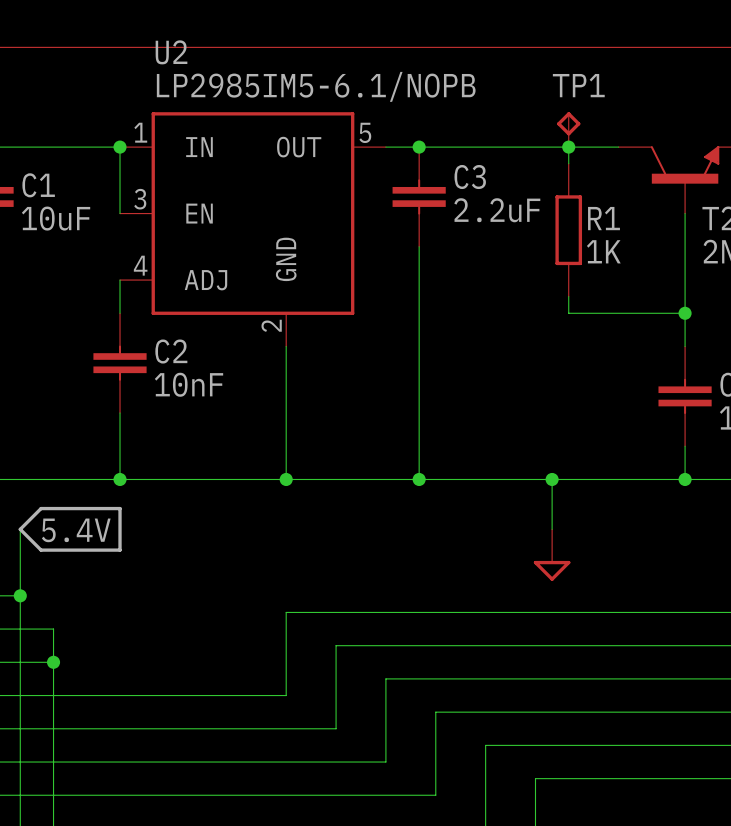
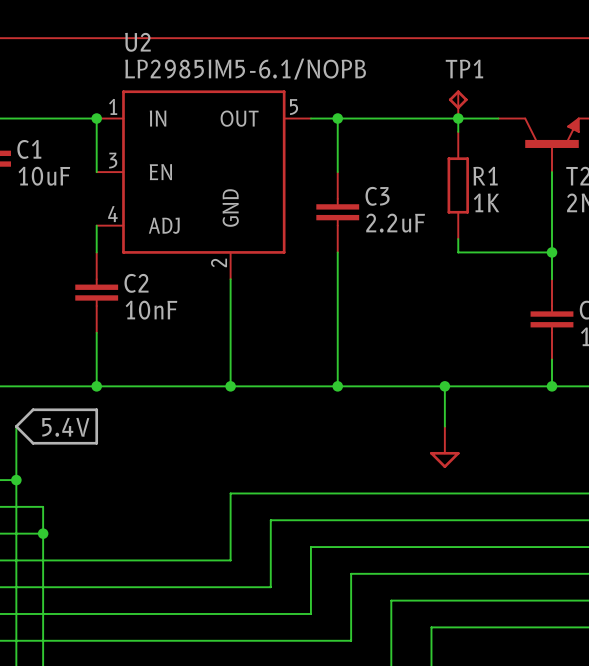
C3 position: (419, 196) -> (337, 212)

